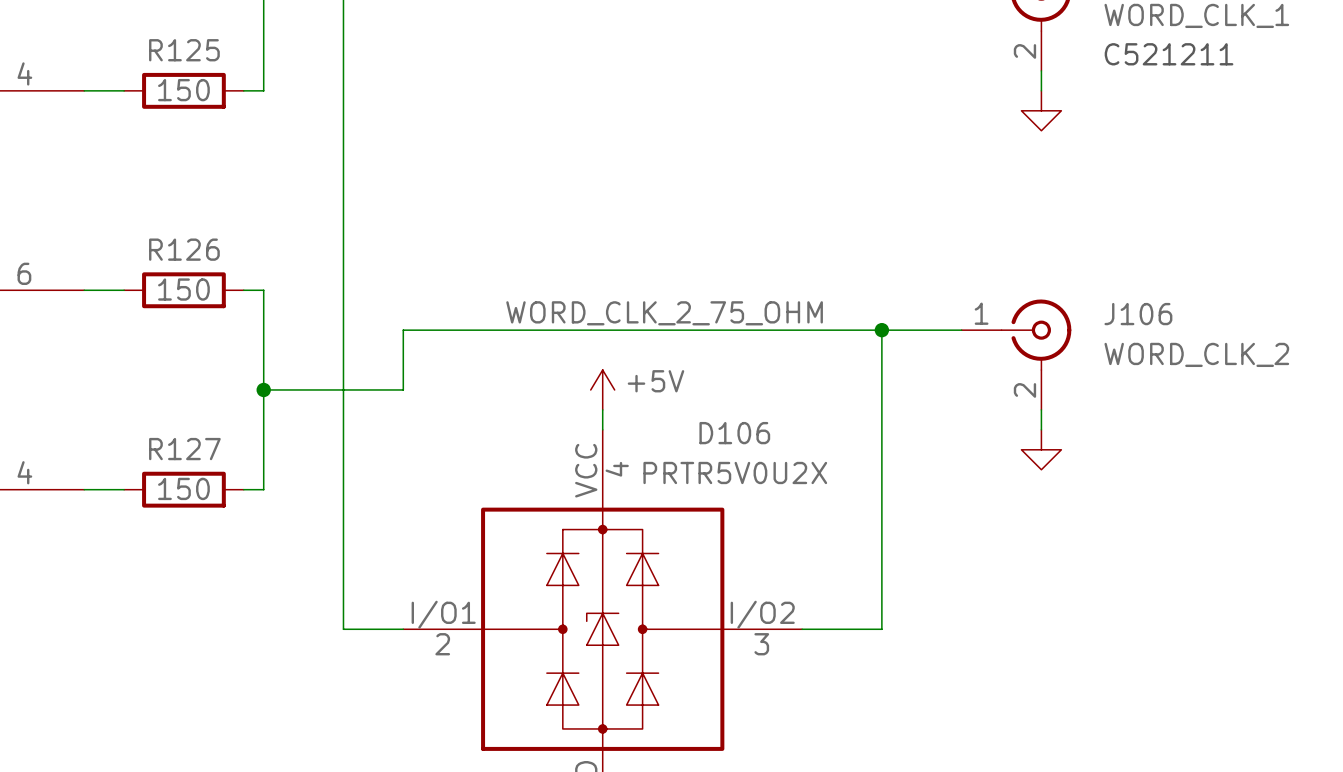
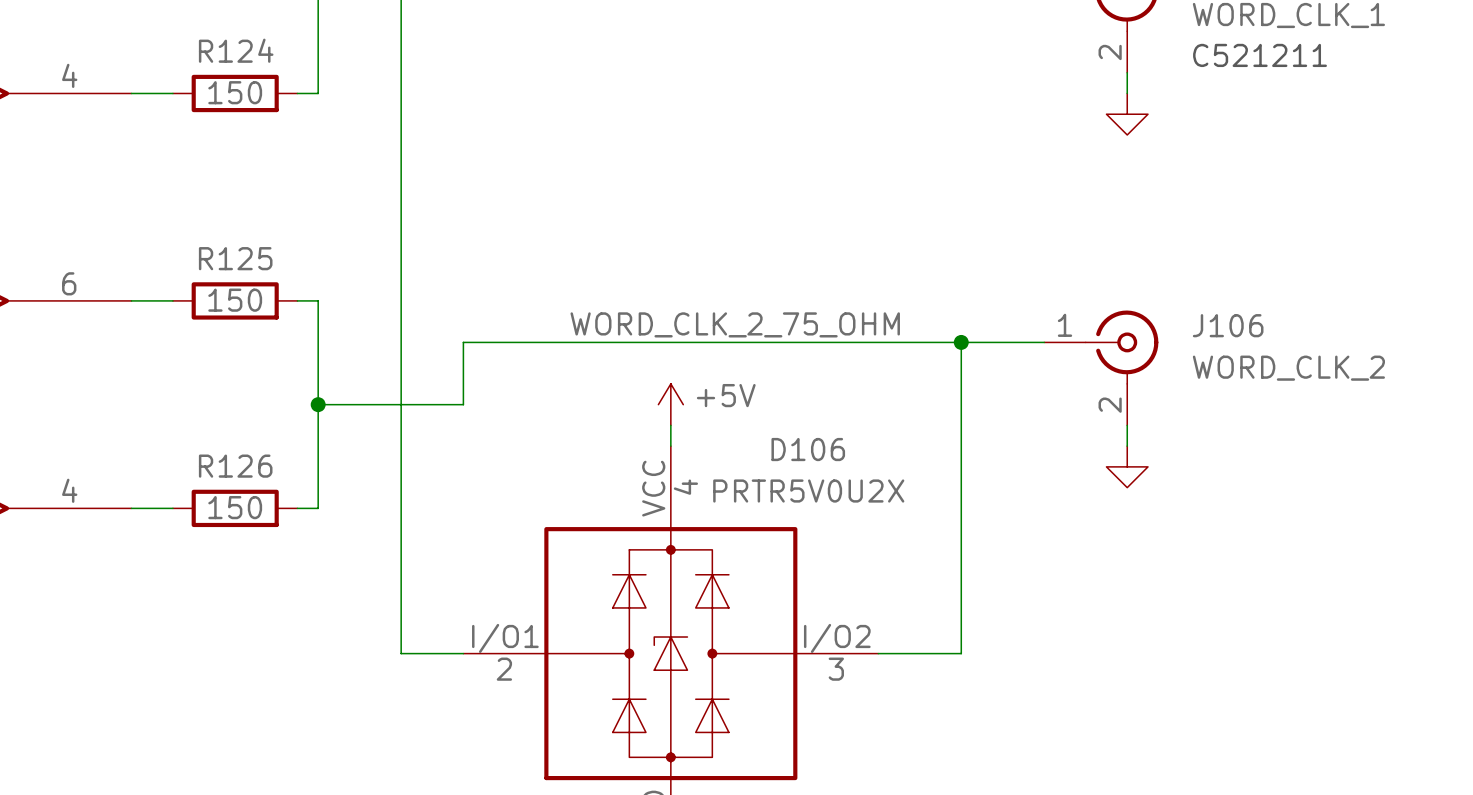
R125 name: R125 (184, 50) -> R124 (236, 50)
R126 name: R126 (184, 249) -> R125 (235, 258)
R127 name: R127 (184, 449) -> R126 (235, 466)

